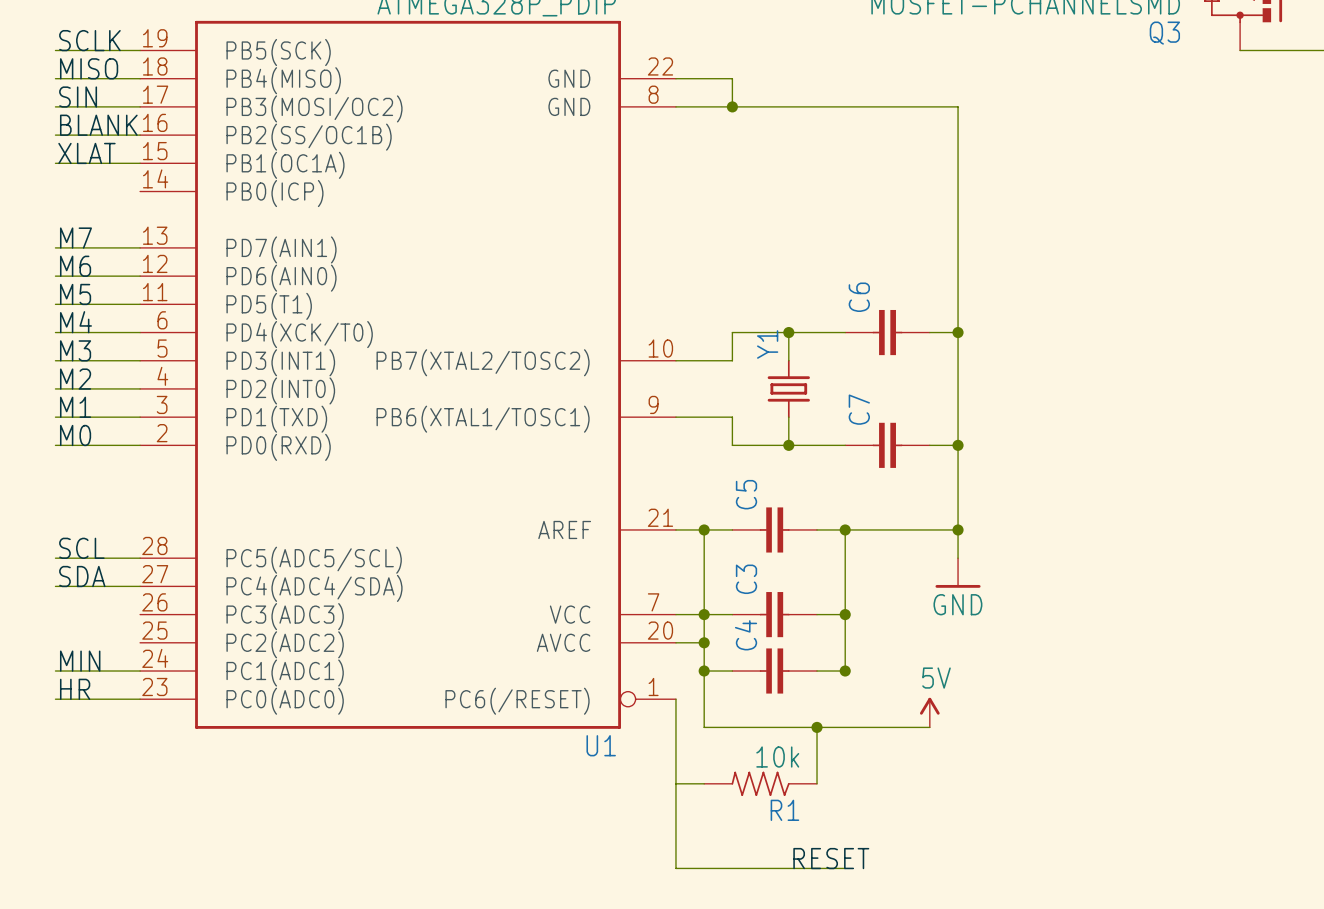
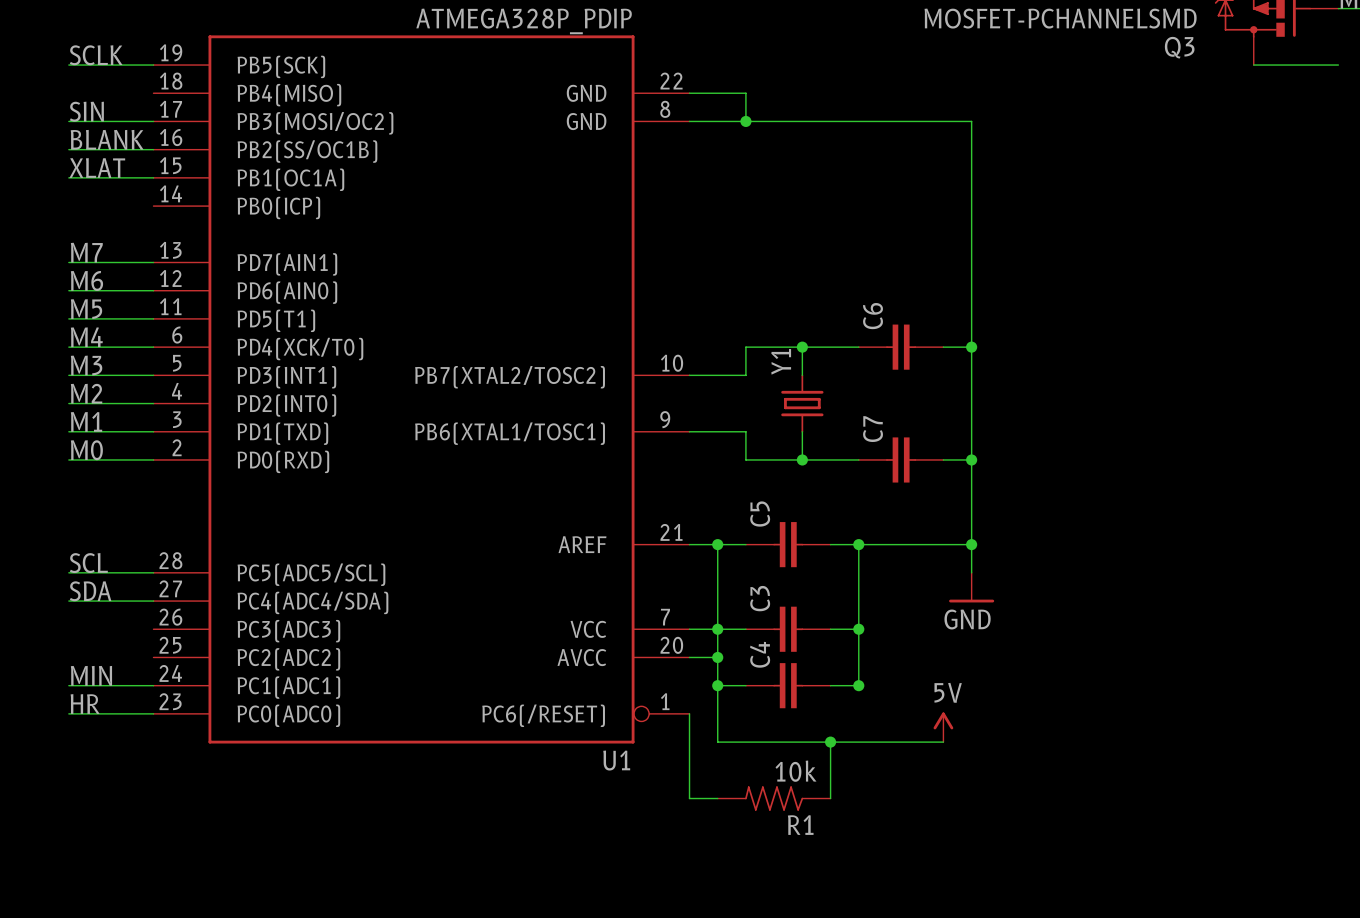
label: MISO (89, 68) -> none
wire: (55, 78) (140, 78) -> none
wire: (675, 783) (675, 868) (845, 868) -> none
label: RESET (831, 858) -> none

